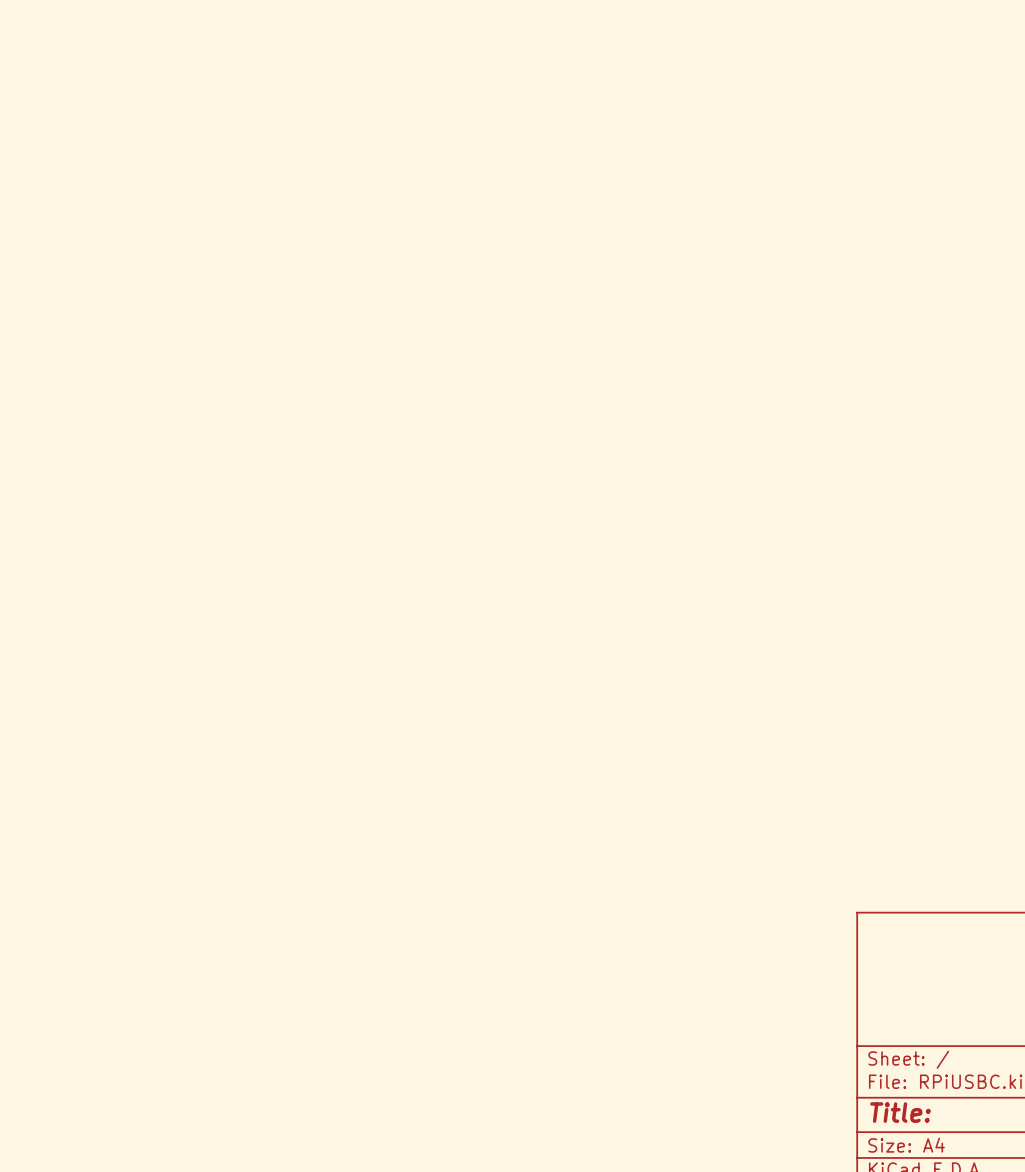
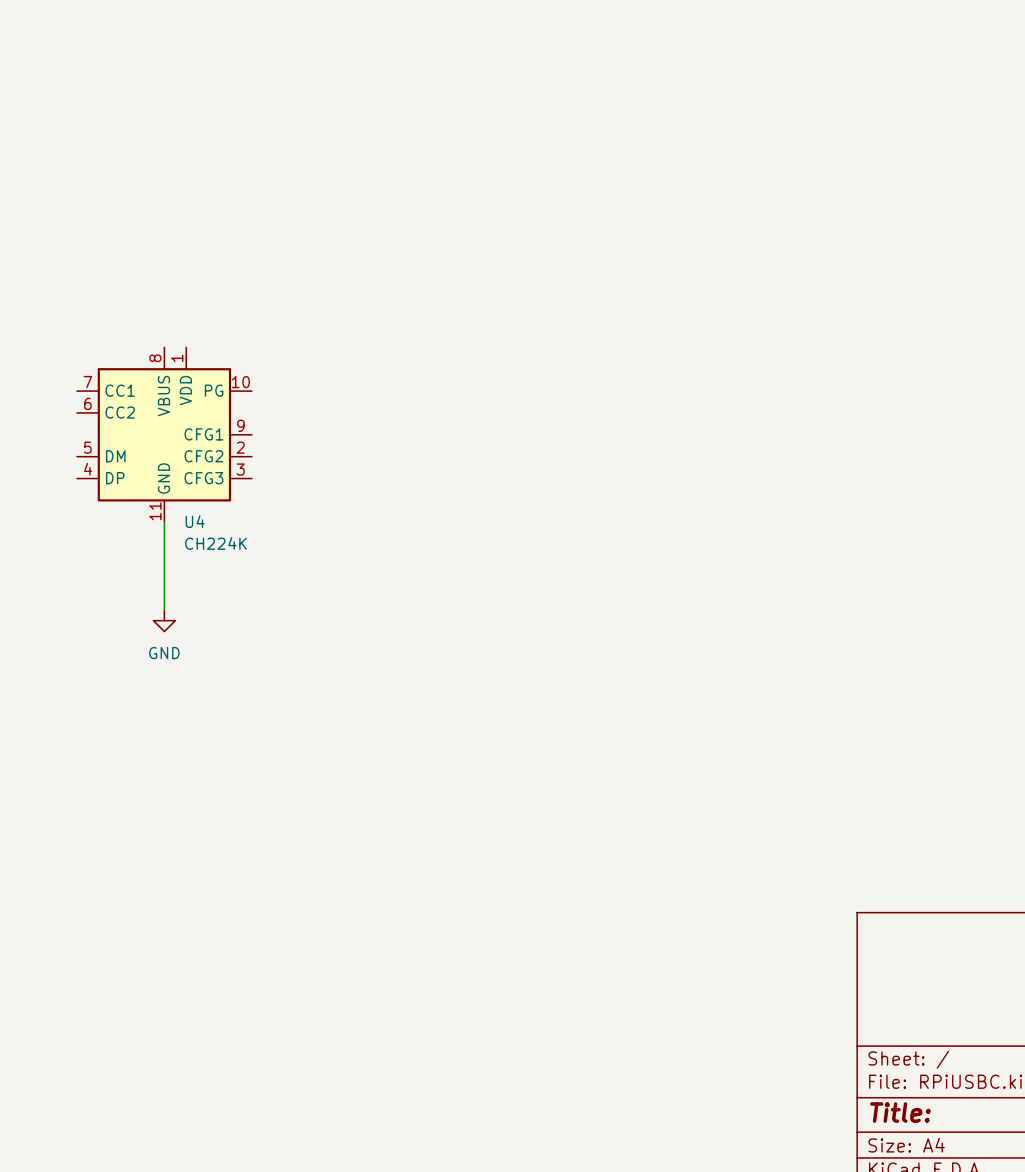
U4: none -> CH224K (164, 434)
wire: none -> (164, 522) (164, 609)
power symbol: none -> GND (164, 620)

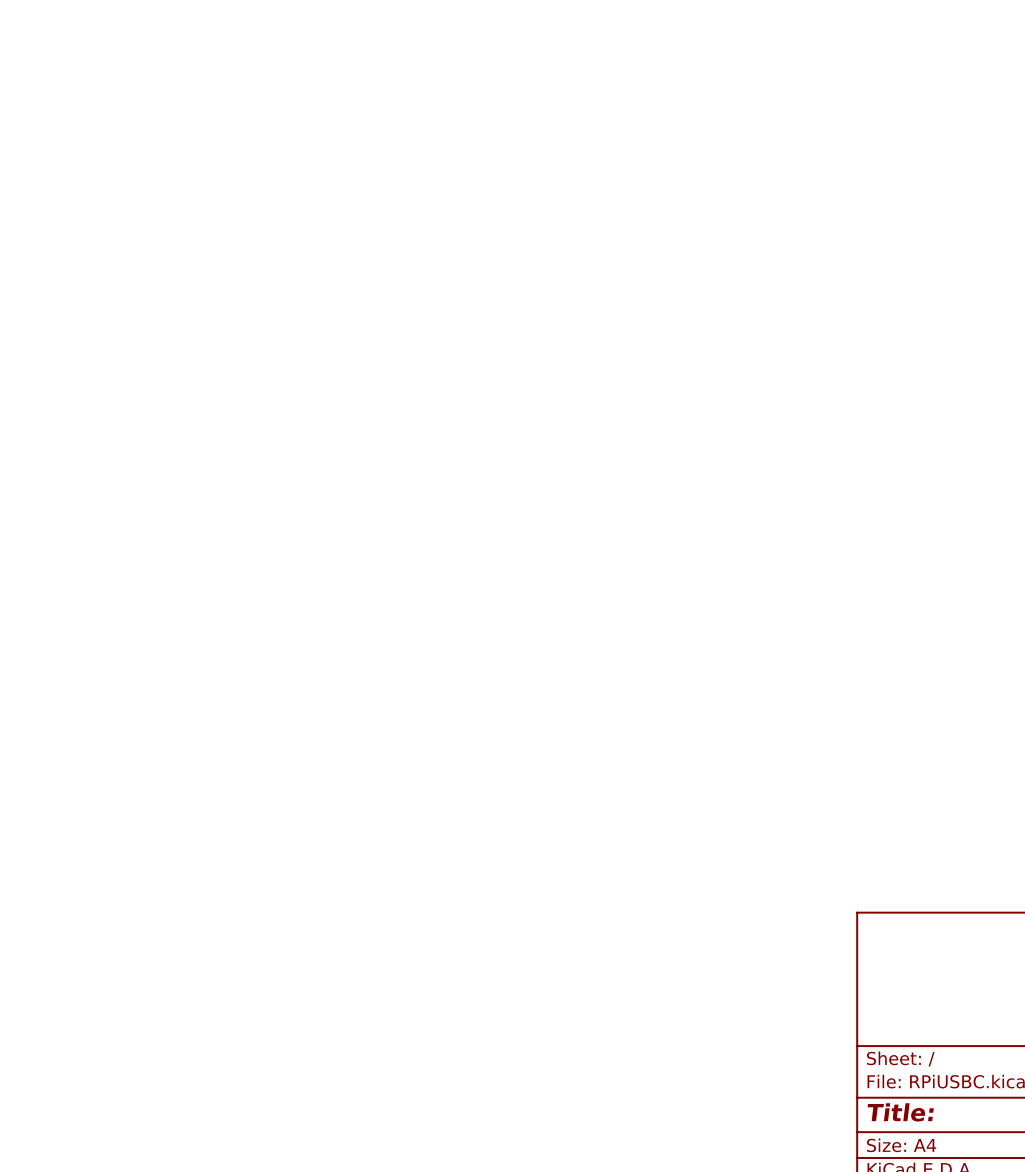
U4: CH224K (164, 434) -> none
wire: (164, 522) (164, 609) -> none
power symbol: GND (164, 620) -> none

